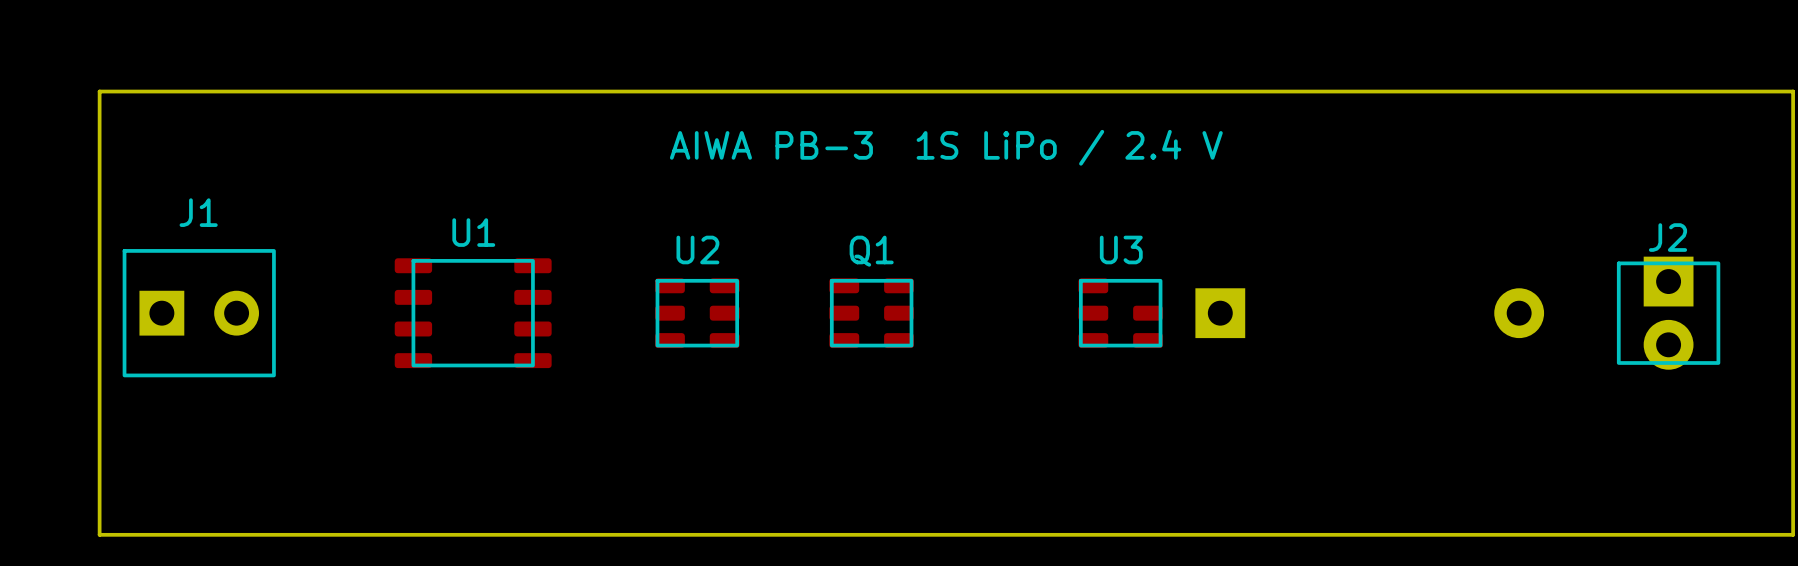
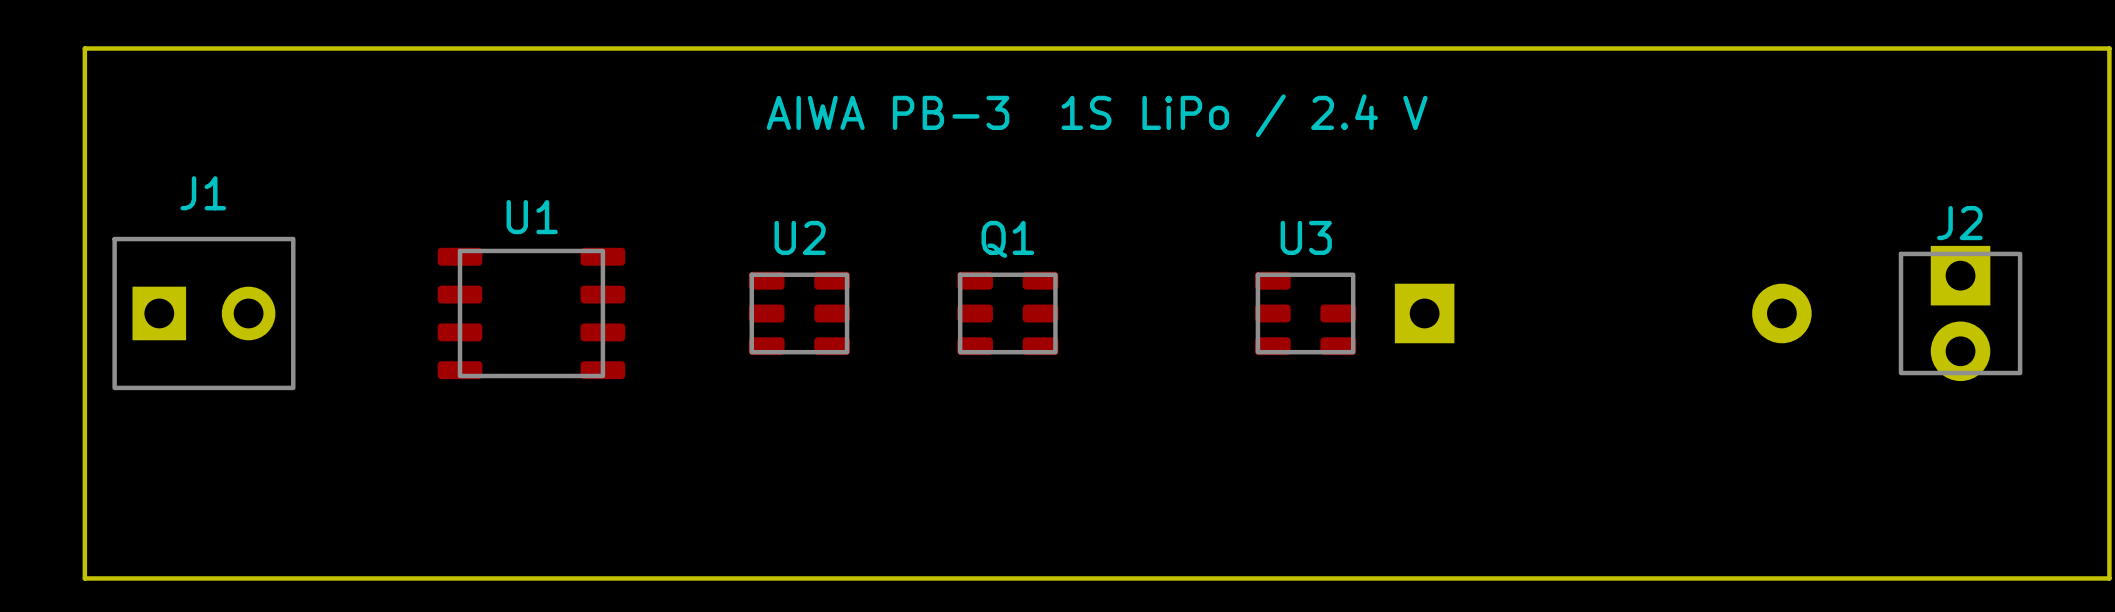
J1 footprint: [122, 249, 276, 378] -> [112, 236, 296, 391]
J2 footprint: [1616, 256, 1721, 370] -> [1898, 245, 2023, 382]
U1 footprint: [394, 258, 552, 369] -> [437, 247, 626, 380]
U2 footprint: [654, 278, 740, 349] -> [748, 271, 851, 356]
Q1 footprint: [829, 278, 914, 349] -> [957, 271, 1059, 356]
U3 footprint: [1078, 278, 1164, 349] -> [1254, 271, 1357, 356]

